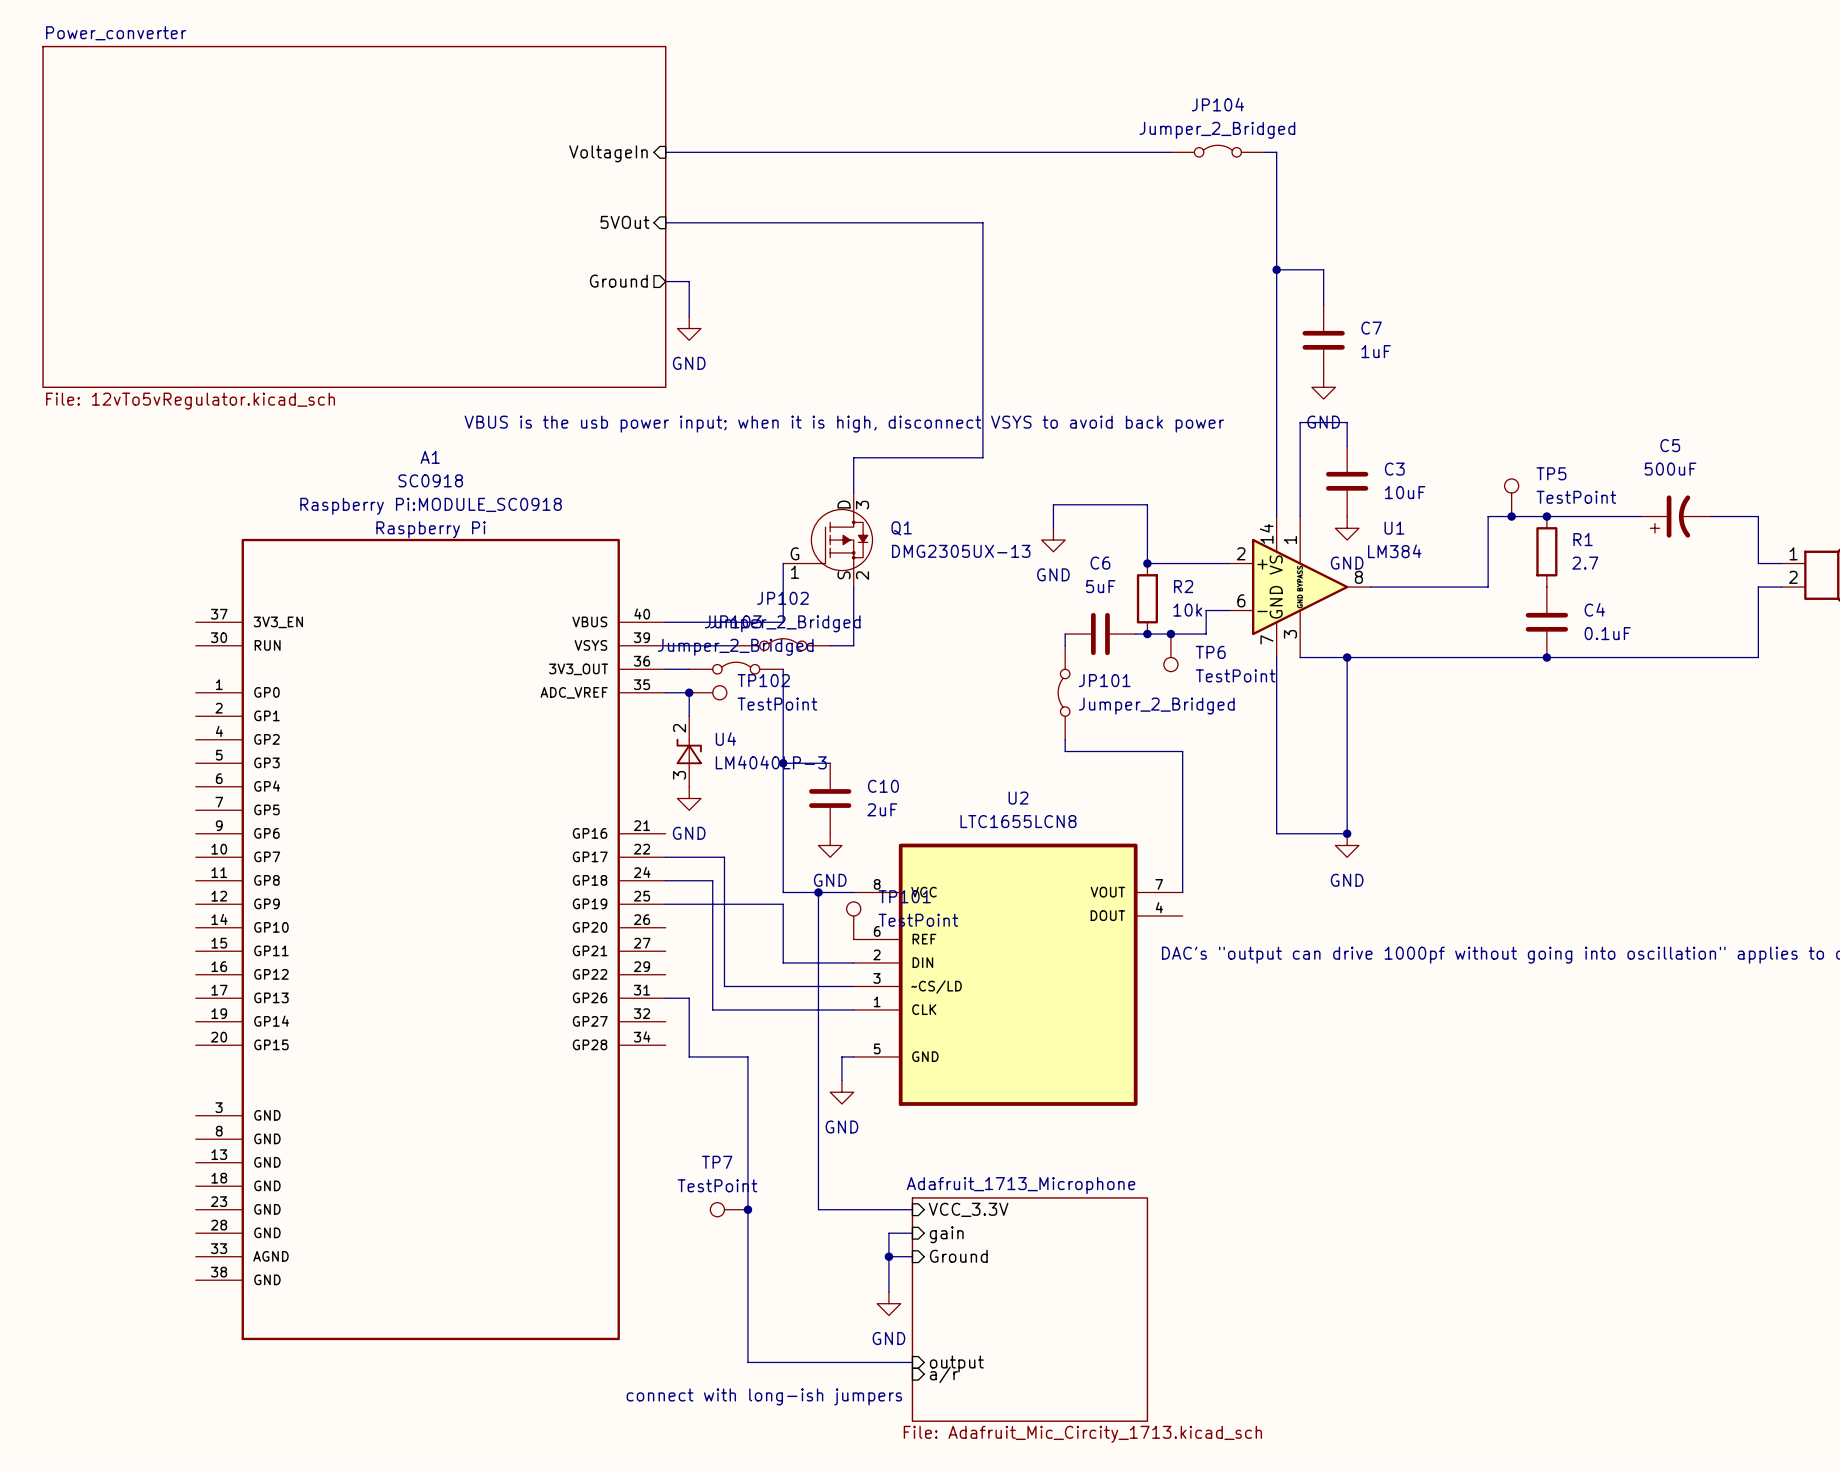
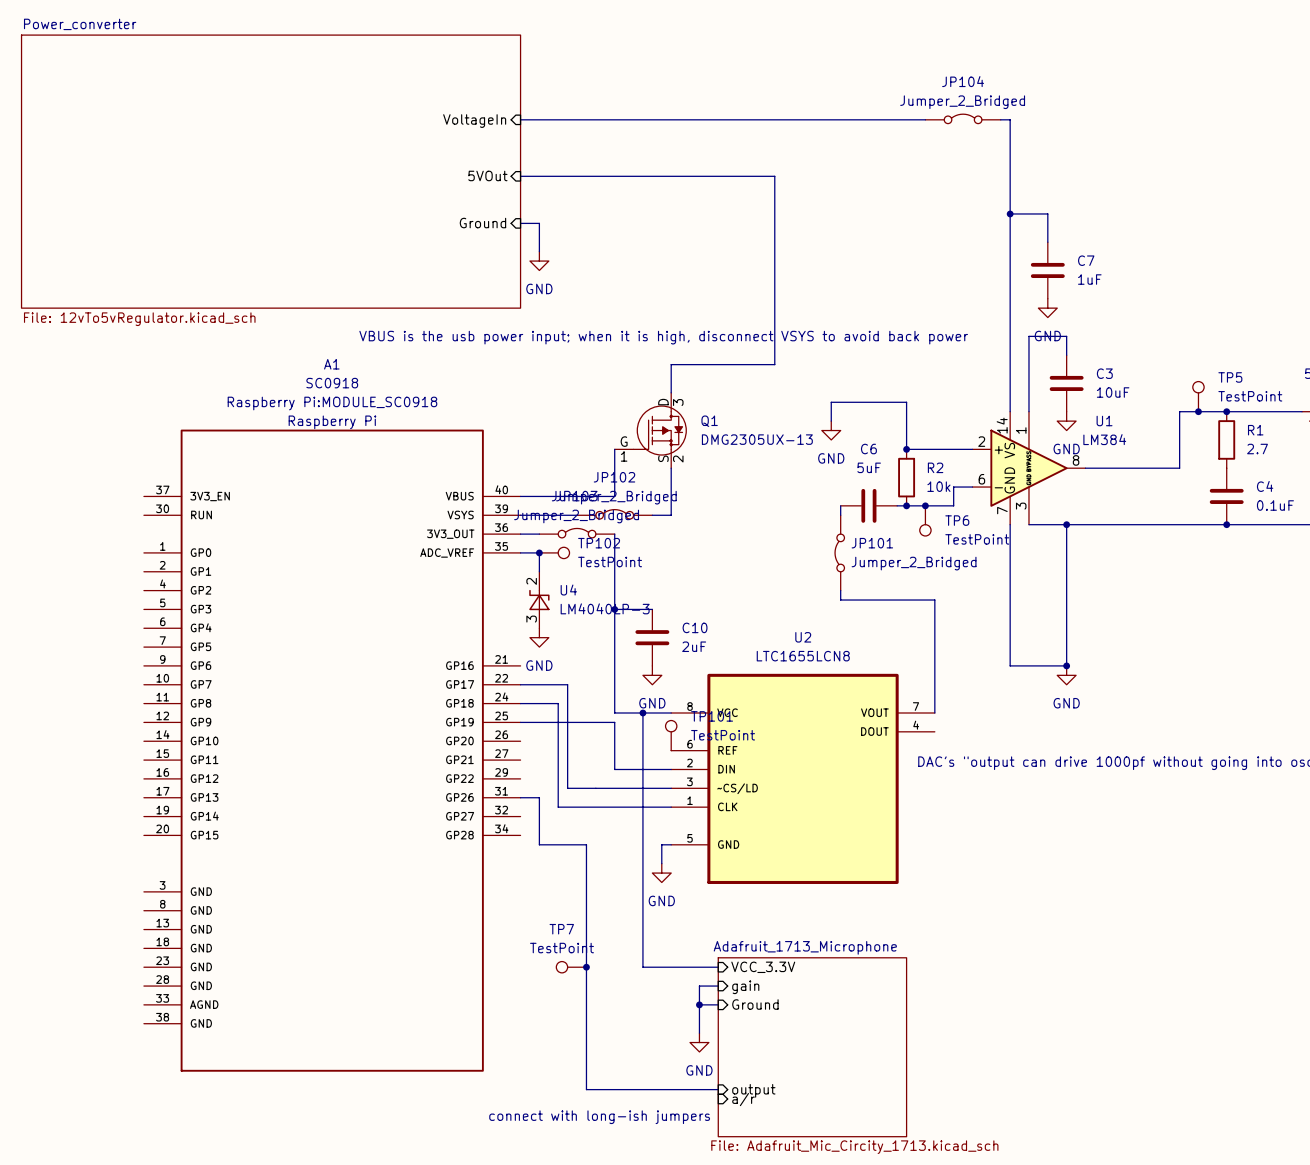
sheet pin shape: output (618, 281) -> input (482, 223)

